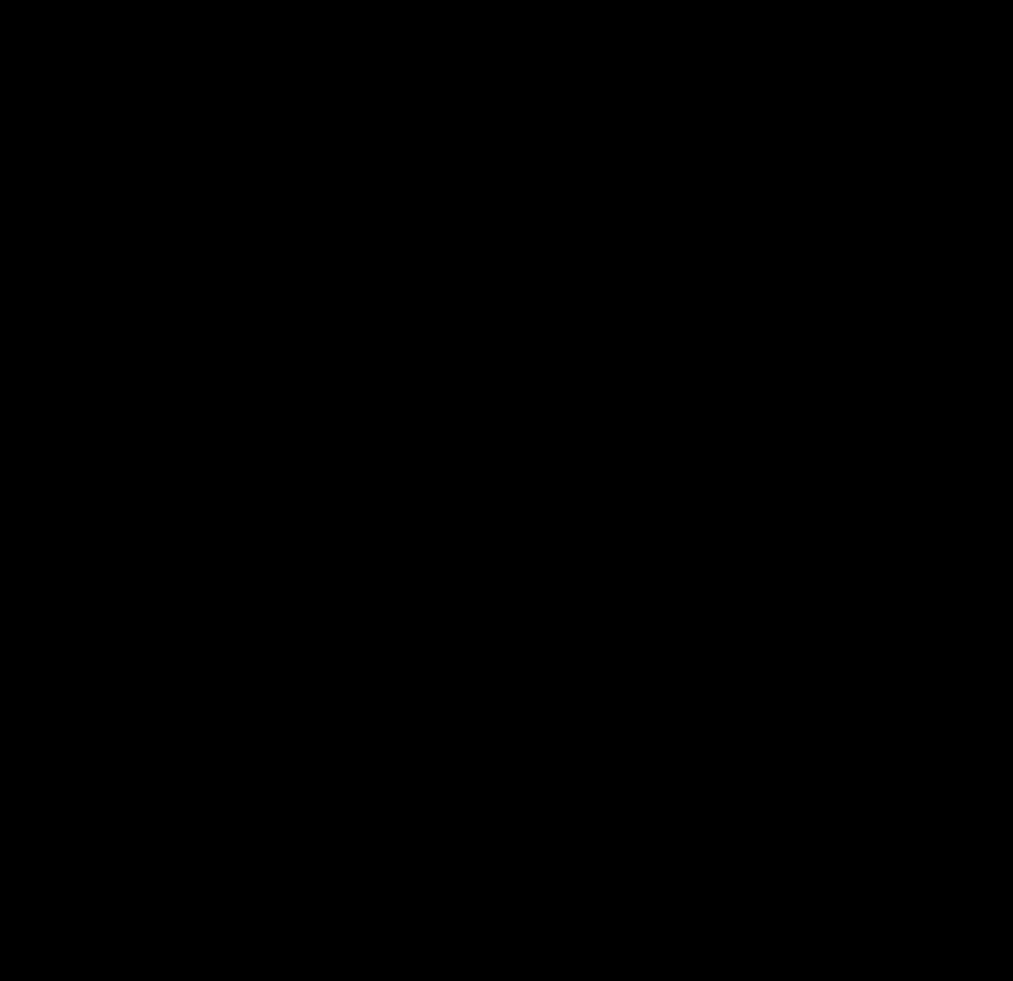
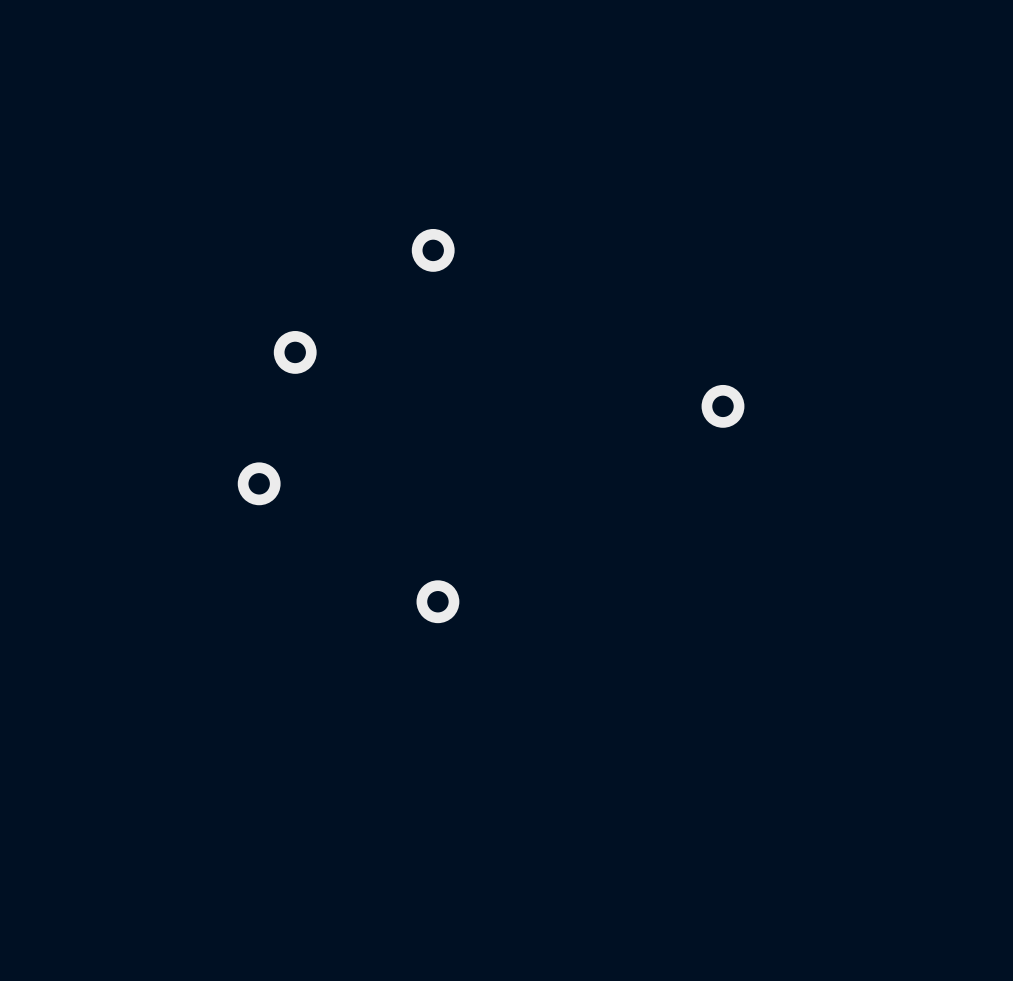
via: none -> (433, 250)
via: none -> (295, 352)
via: none -> (722, 406)
via: none -> (259, 483)
via: none -> (437, 601)

